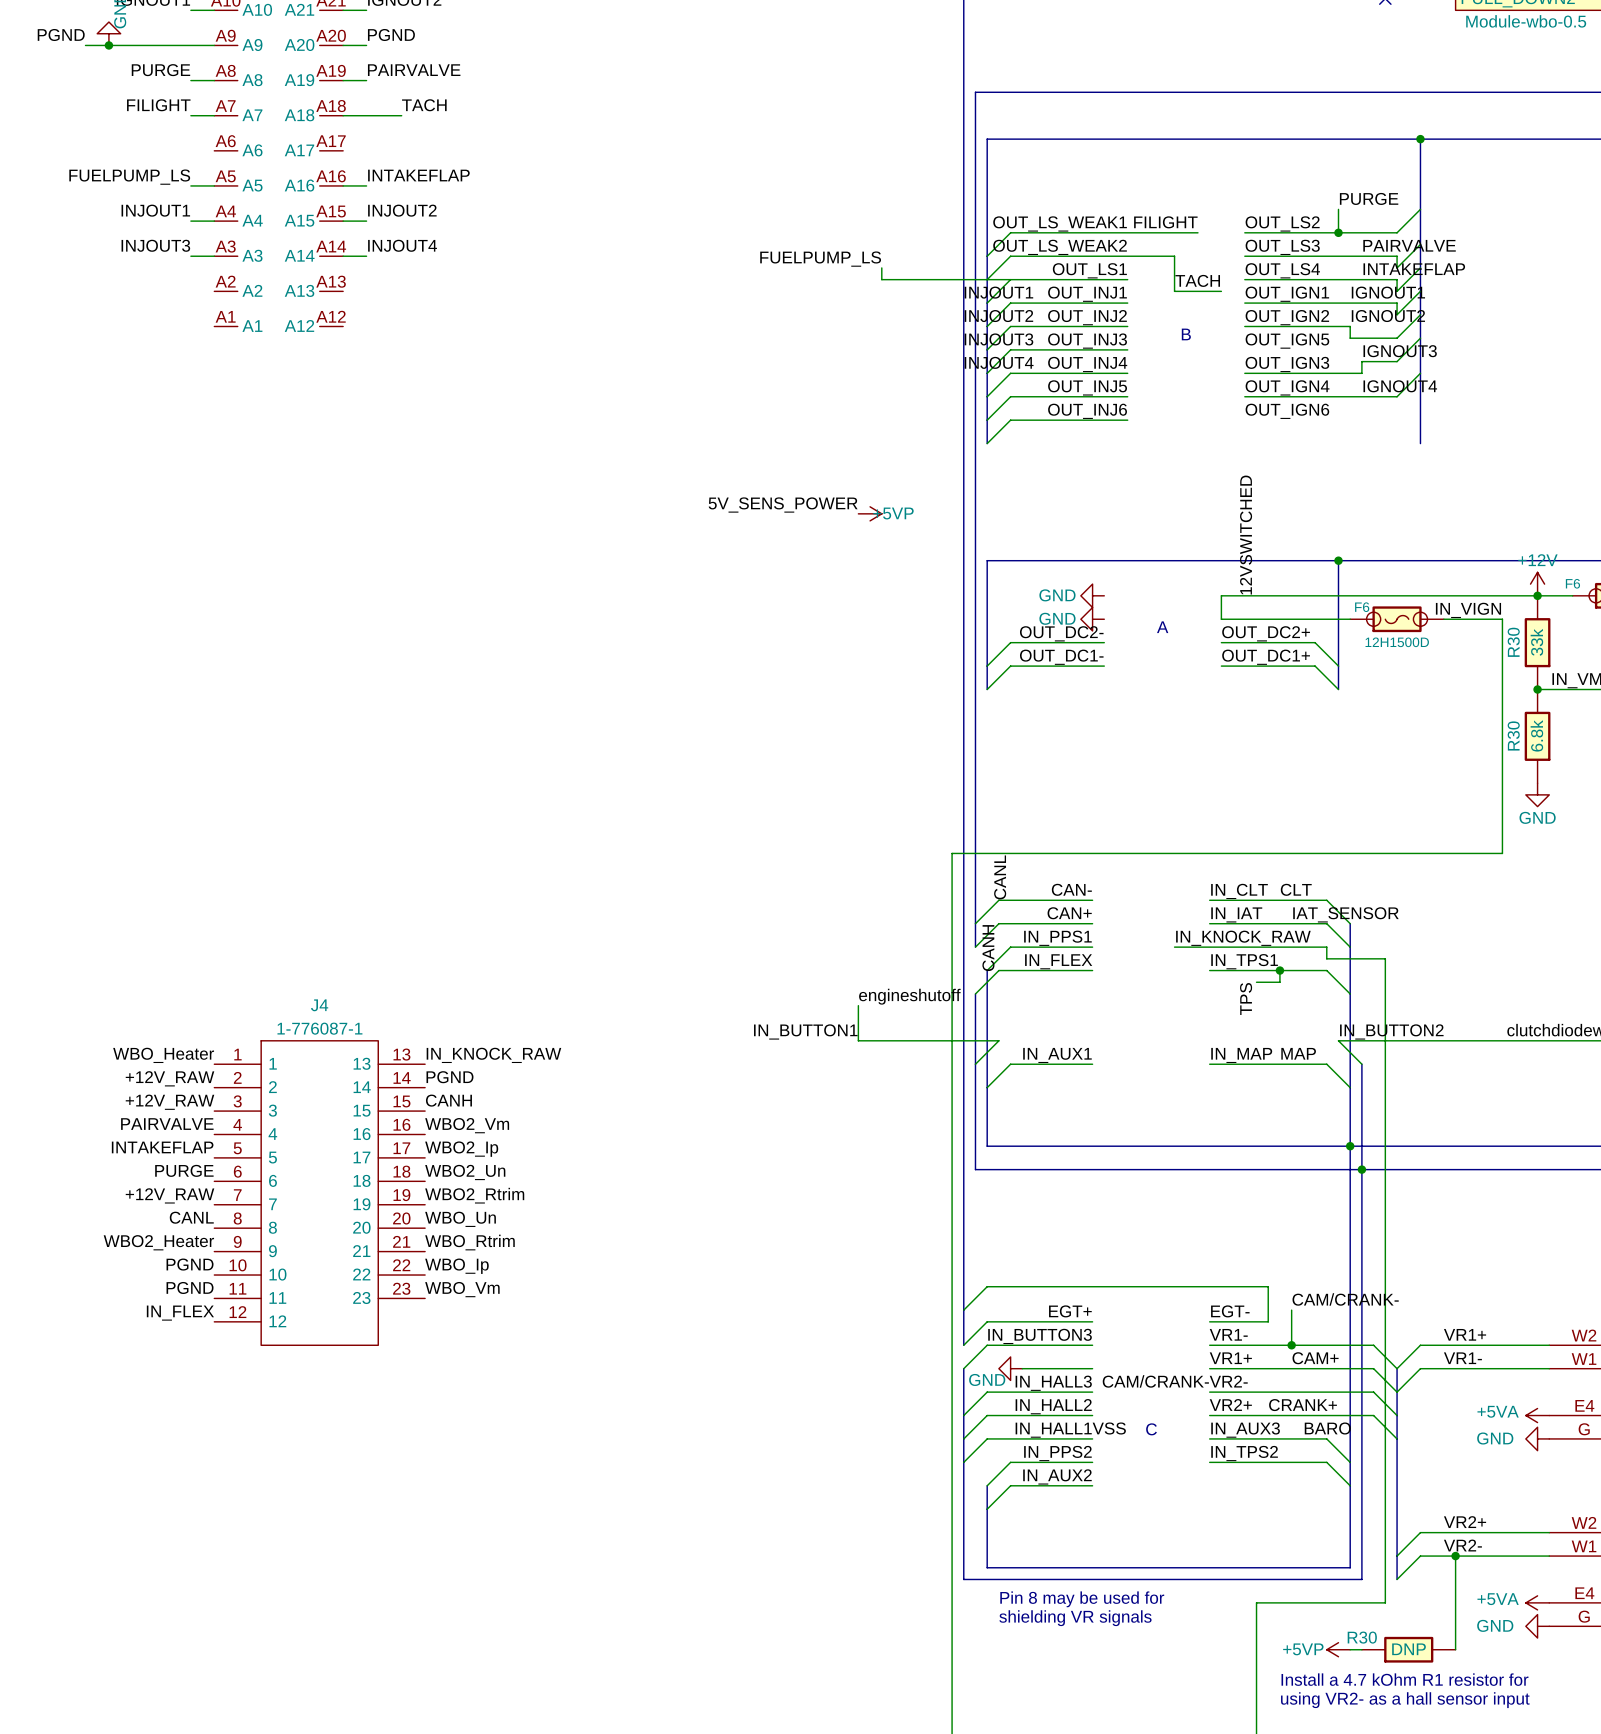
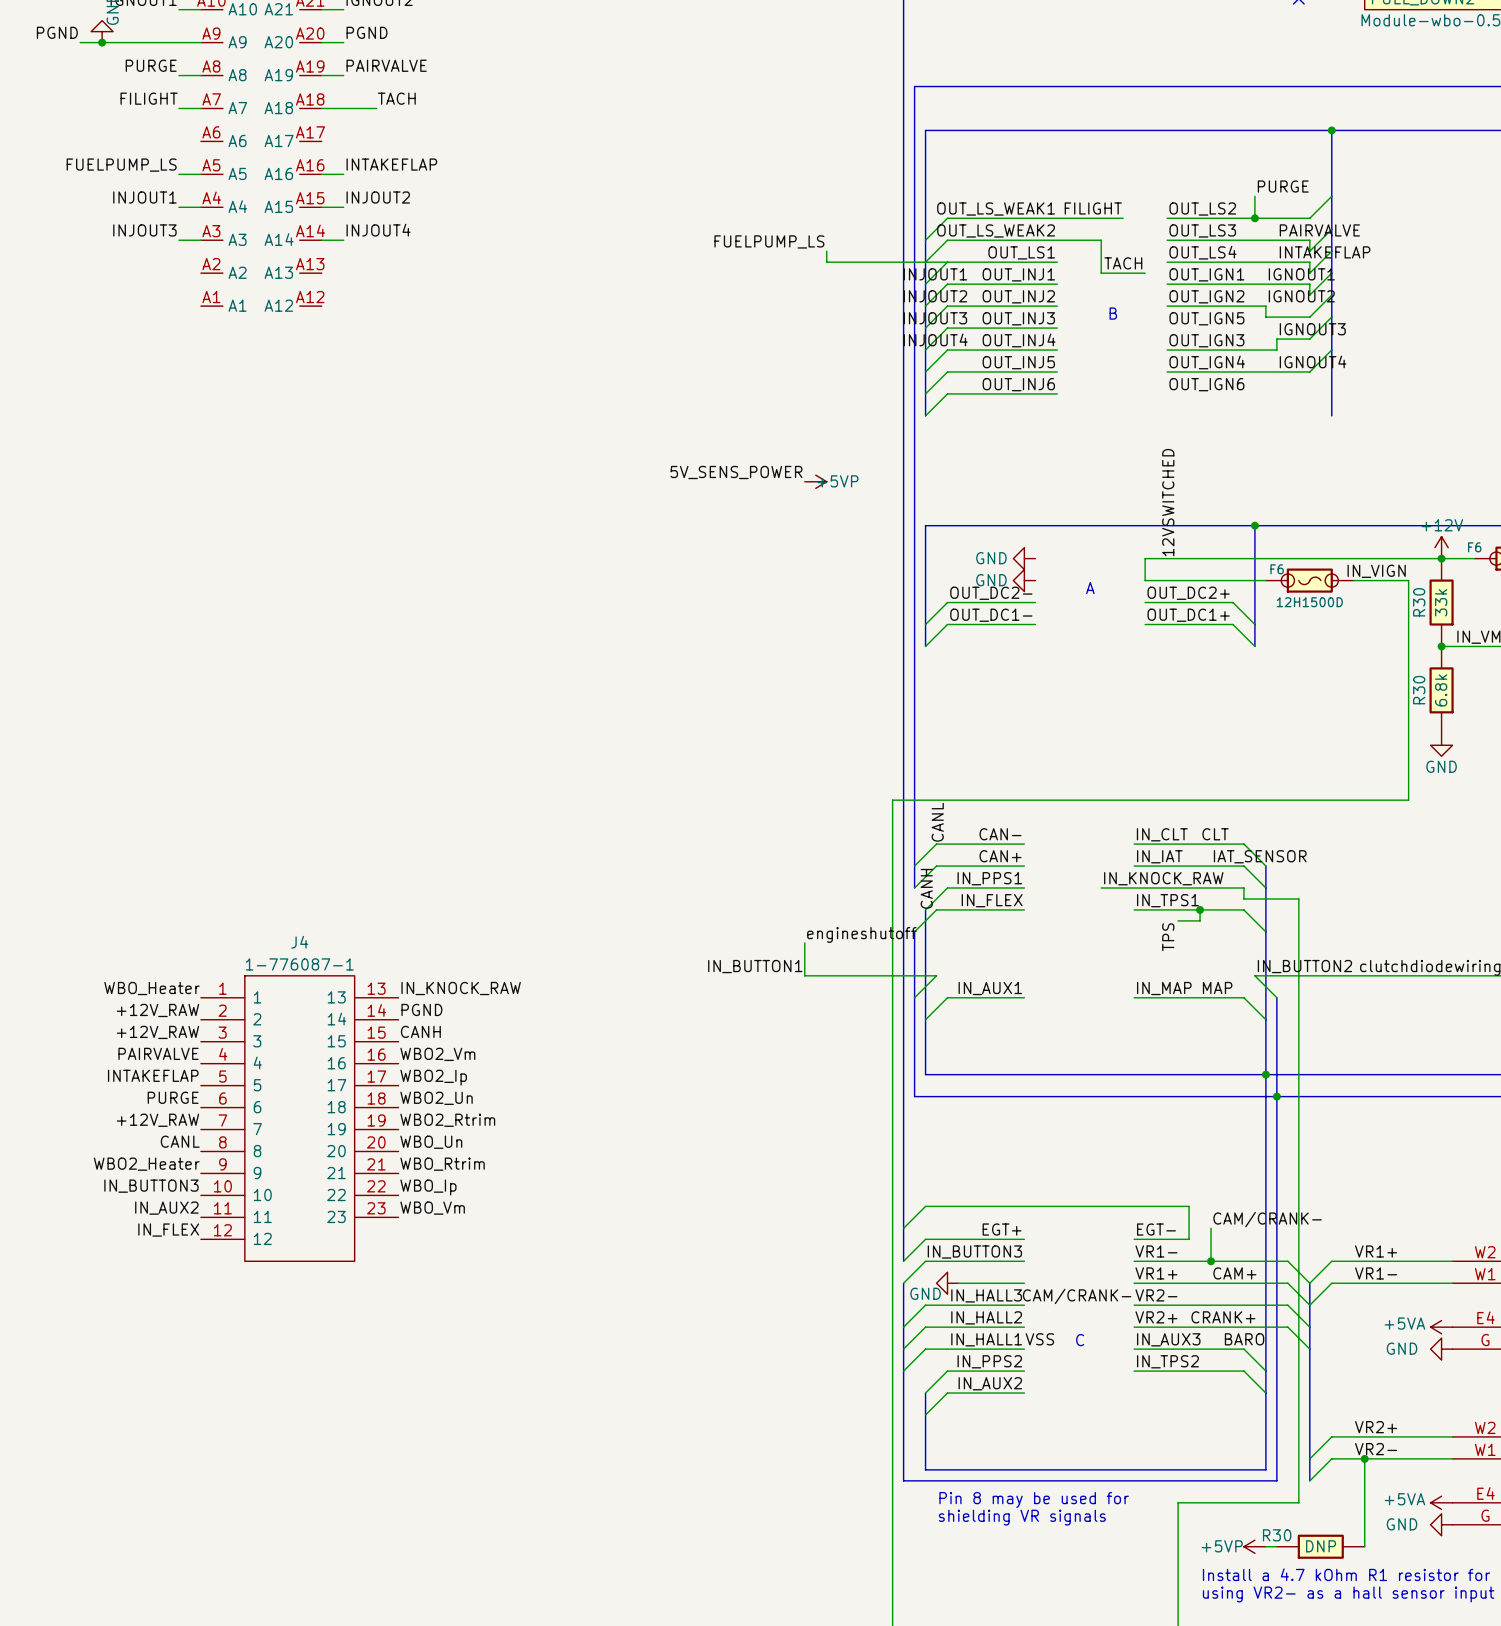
label: PGND (190, 1264) -> IN_BUTTON3 (151, 1186)
label: PGND (190, 1287) -> IN_AUX2 (166, 1208)

